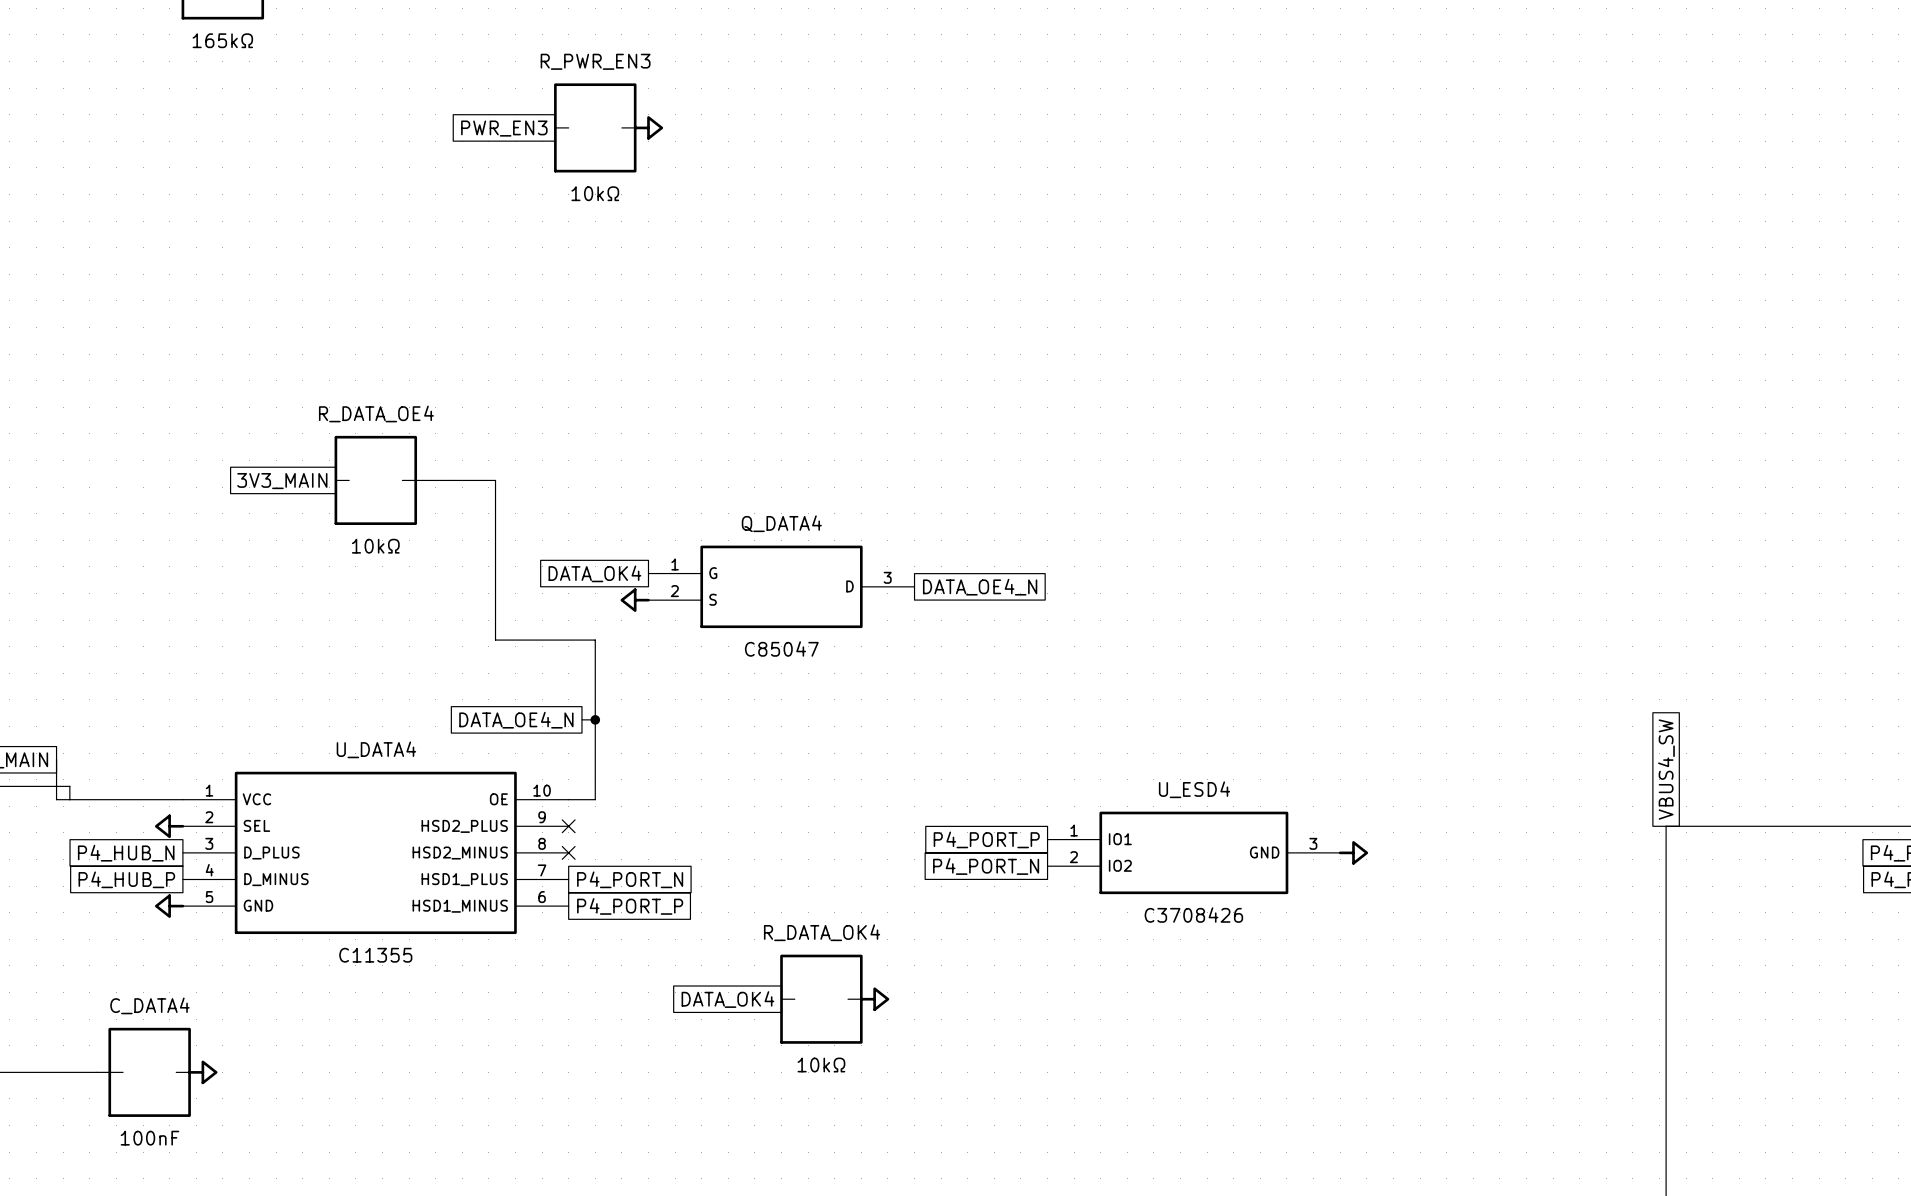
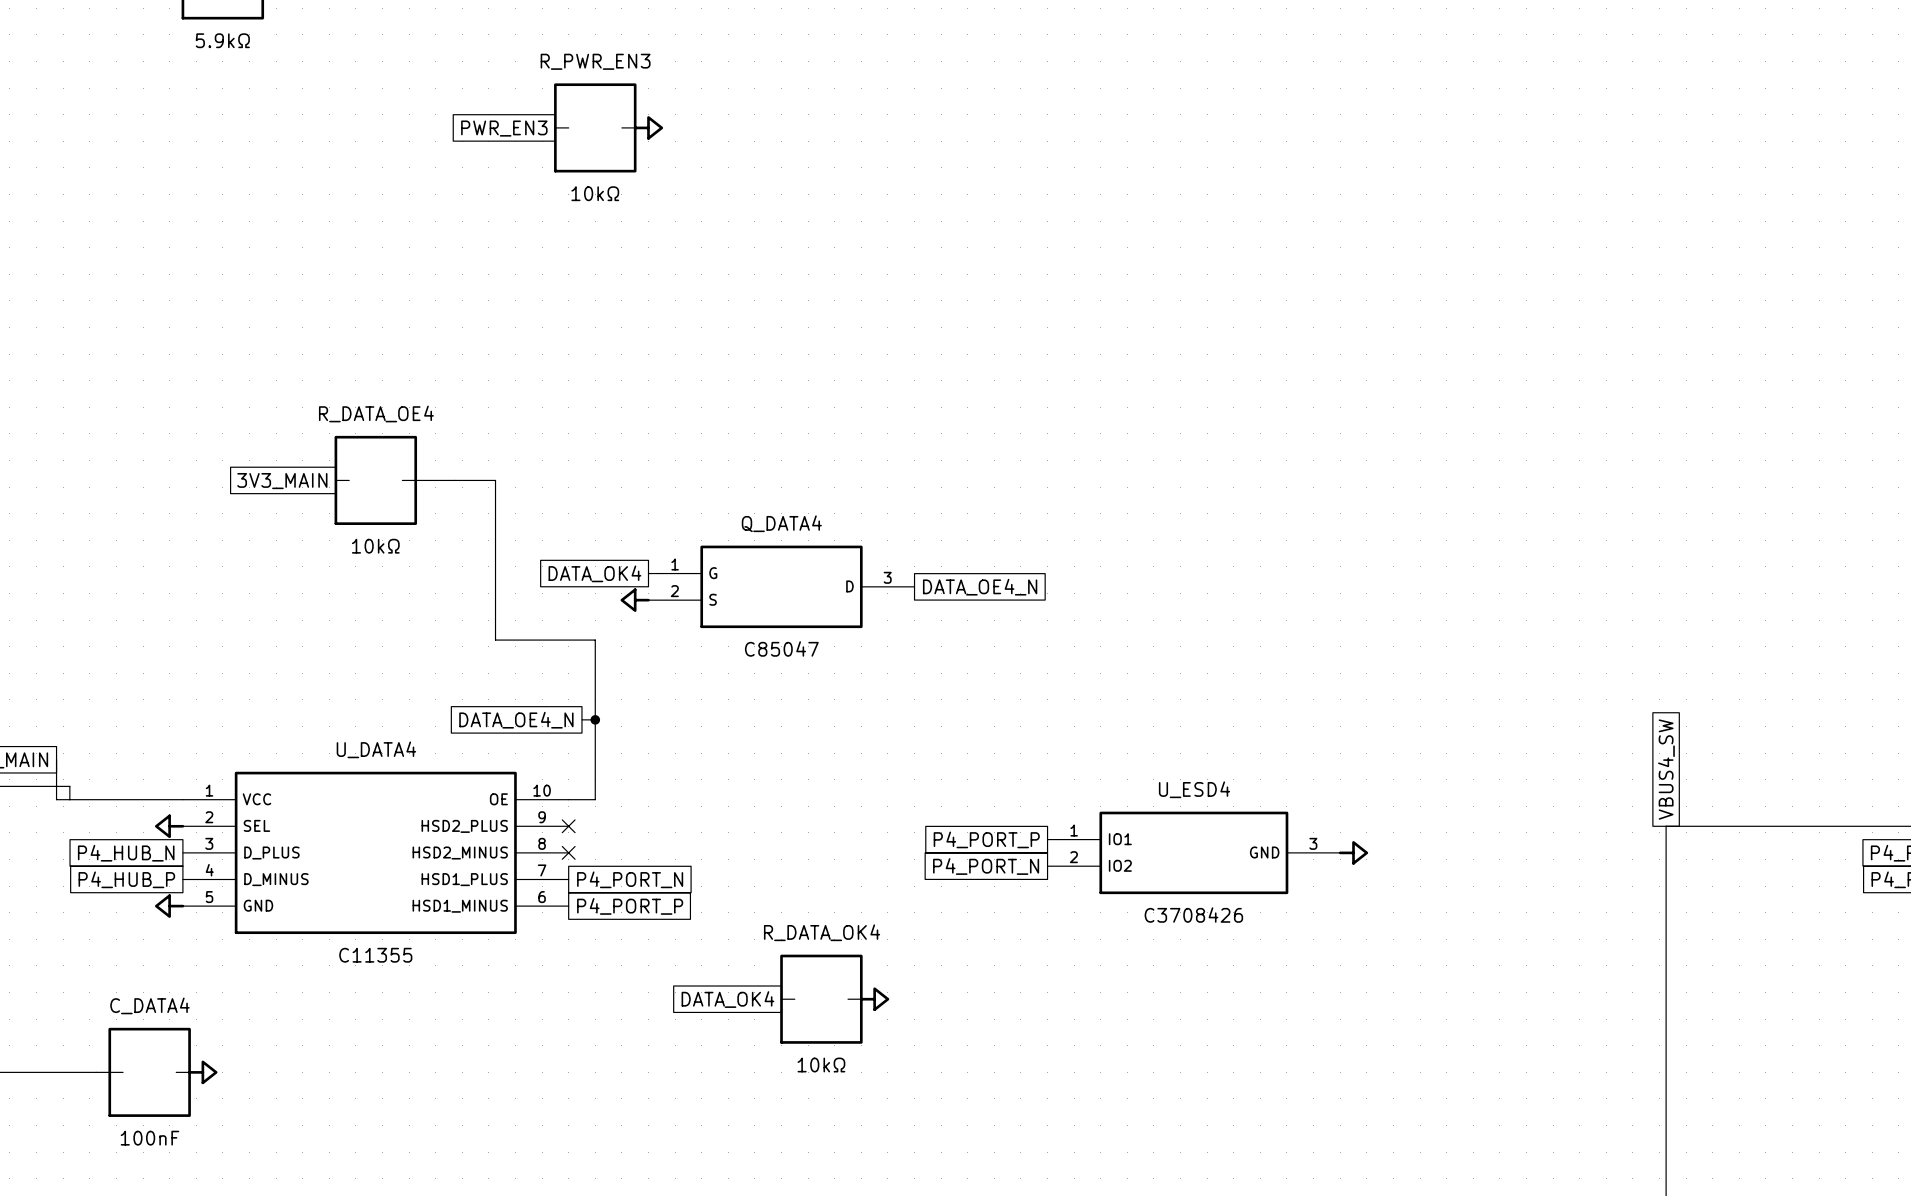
part value: 165kΩ (222, 40) -> 5.9kΩ (222, 40)

